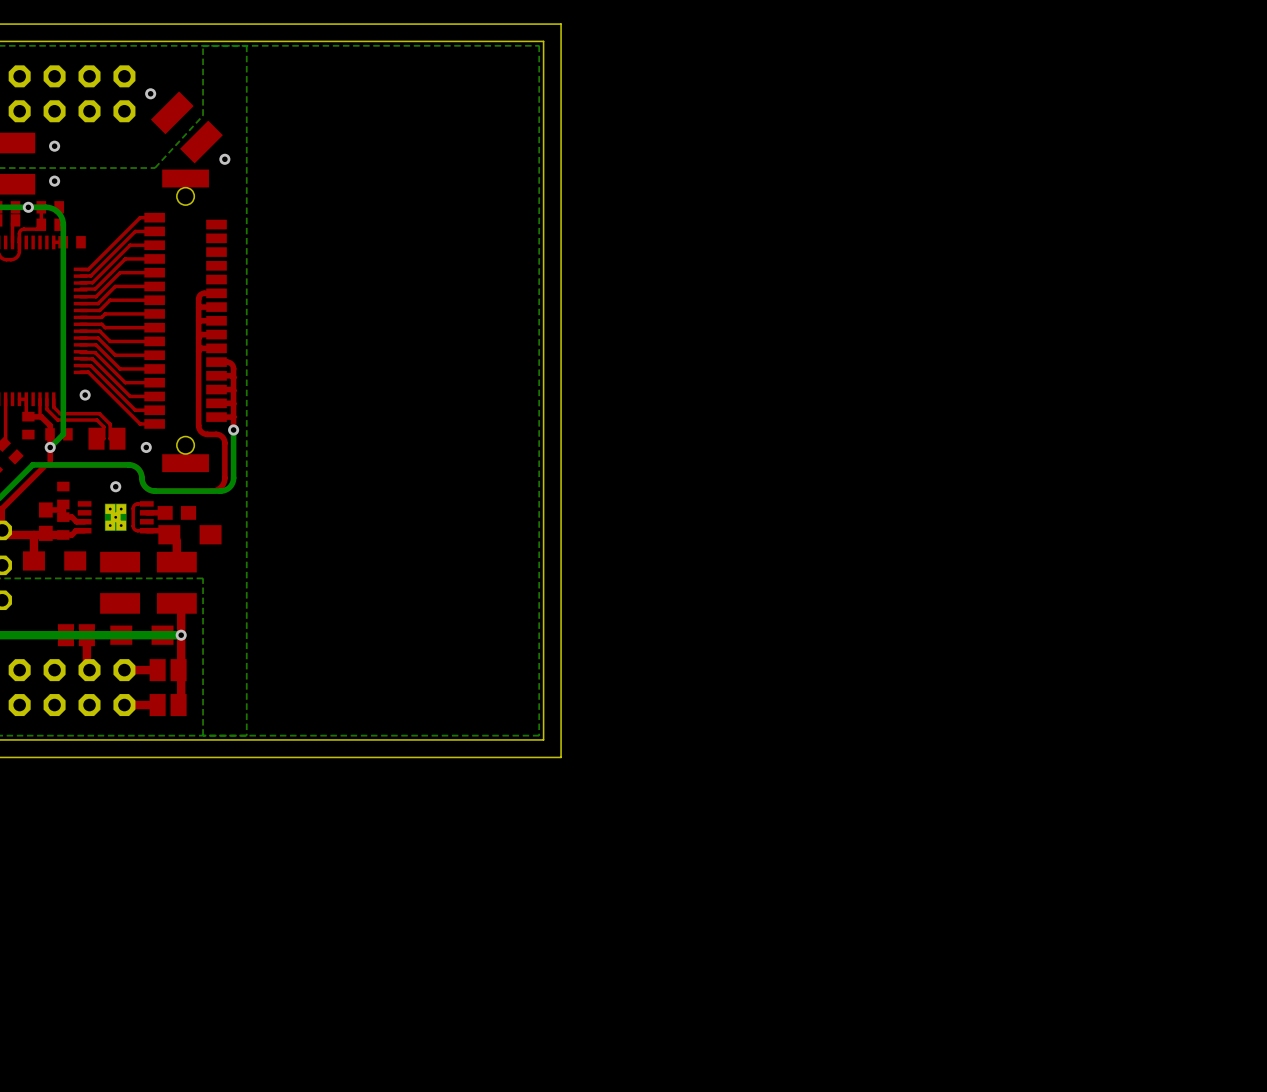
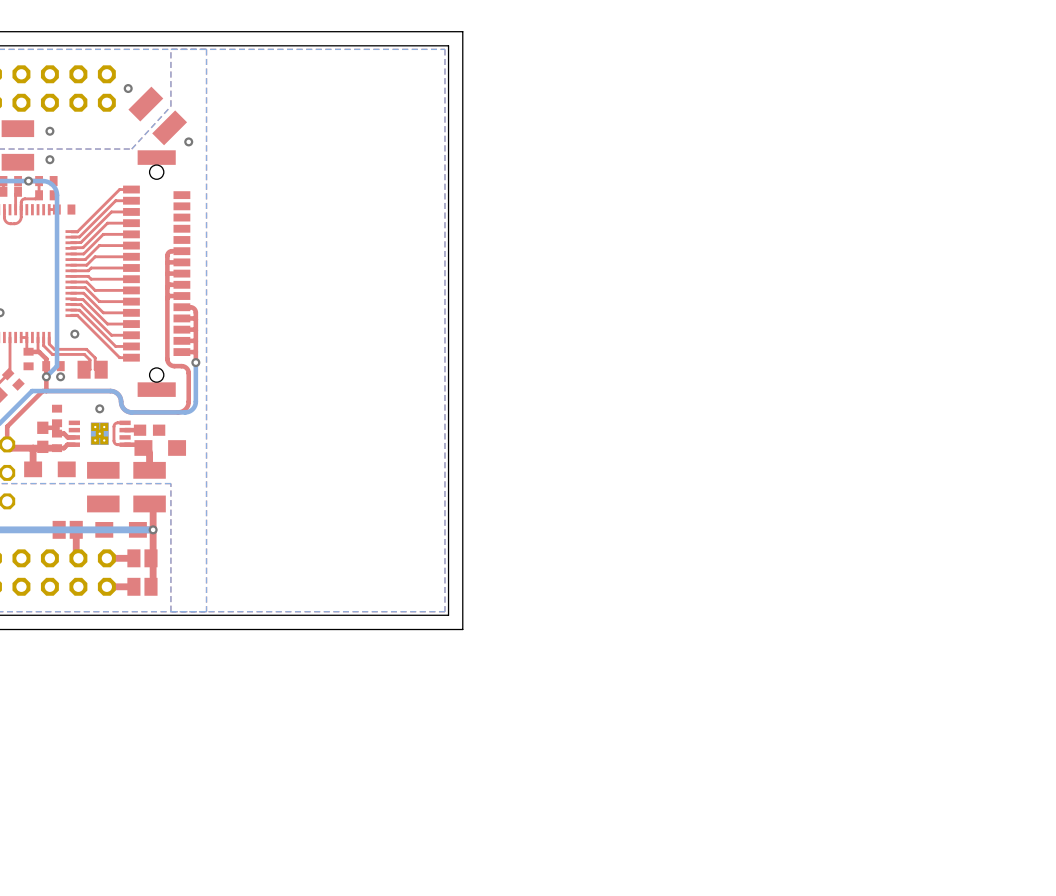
via position: (146, 447) -> (60, 376)

